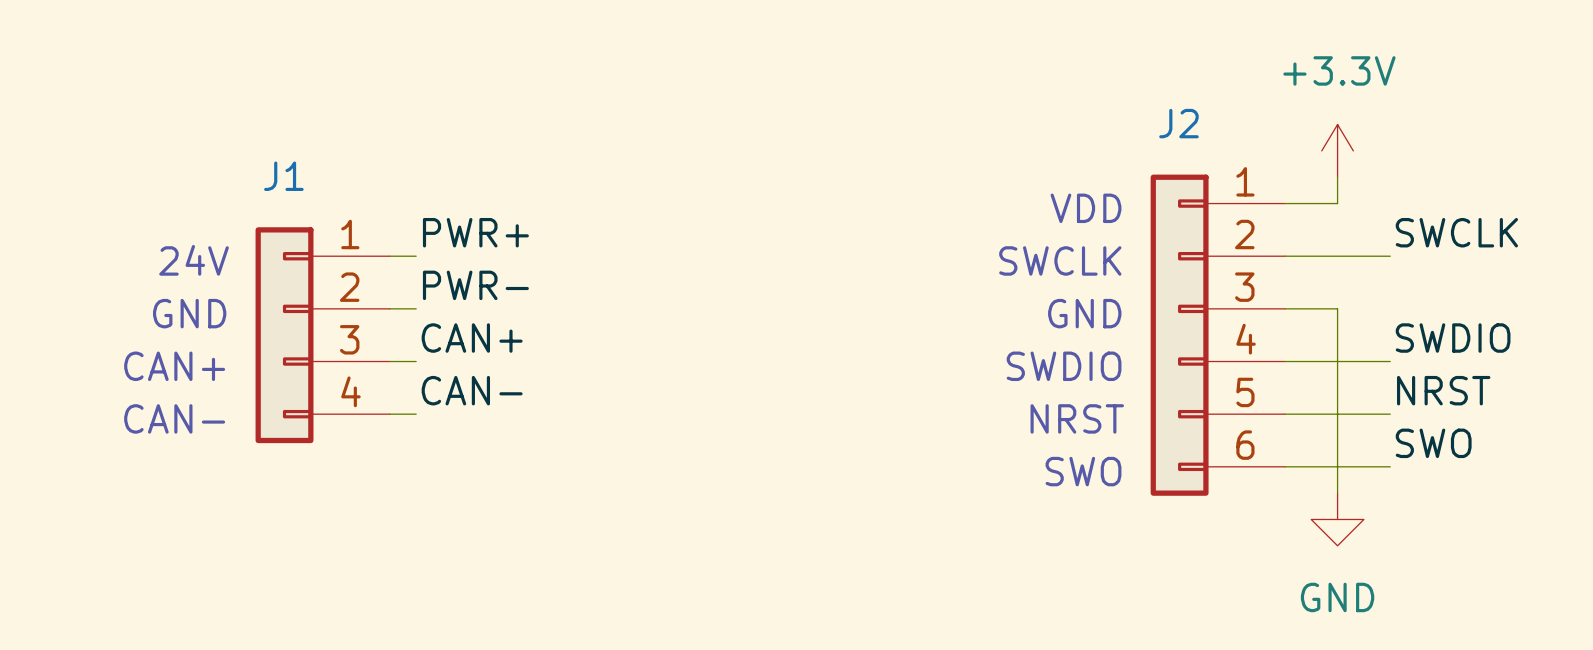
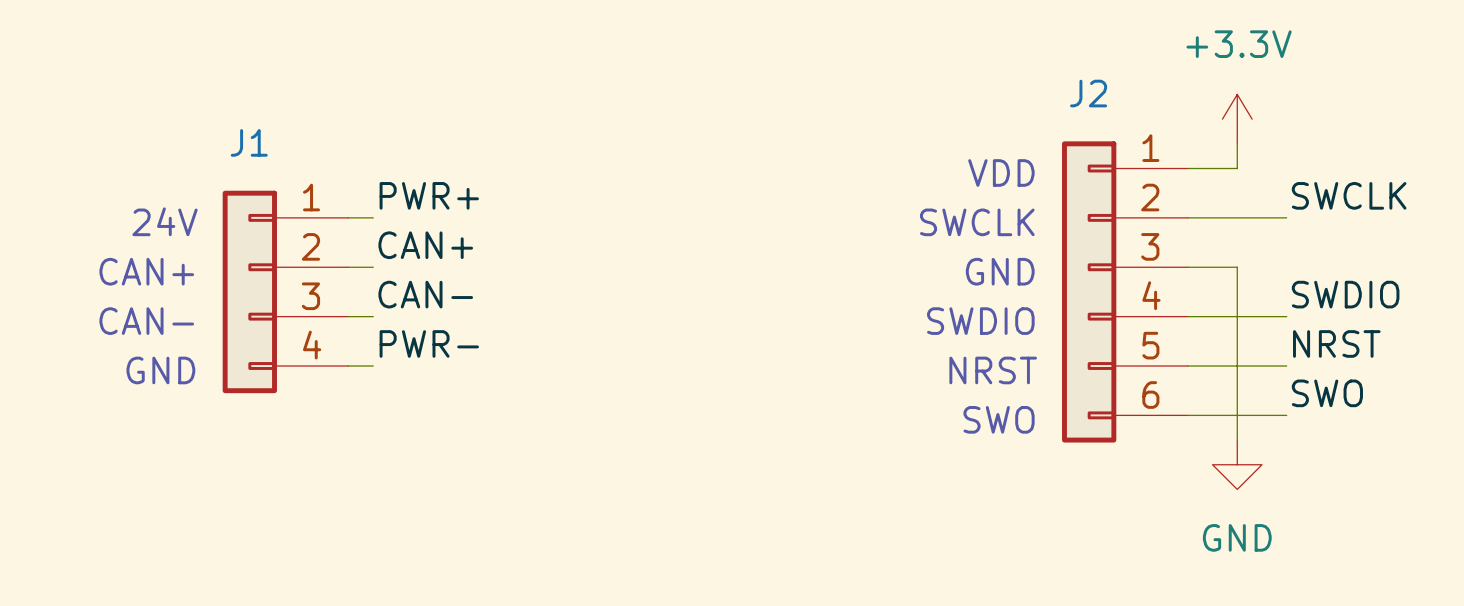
label: PWR- (475, 285) -> CAN+ (425, 245)
text: GND (189, 313) -> CAN+ (146, 271)
label: CAN+ (472, 338) -> CAN- (425, 294)
text: CAN+ (174, 366) -> CAN- (146, 321)
label: CAN- (472, 390) -> PWR- (429, 343)
text: CAN- (174, 418) -> GND (160, 370)

